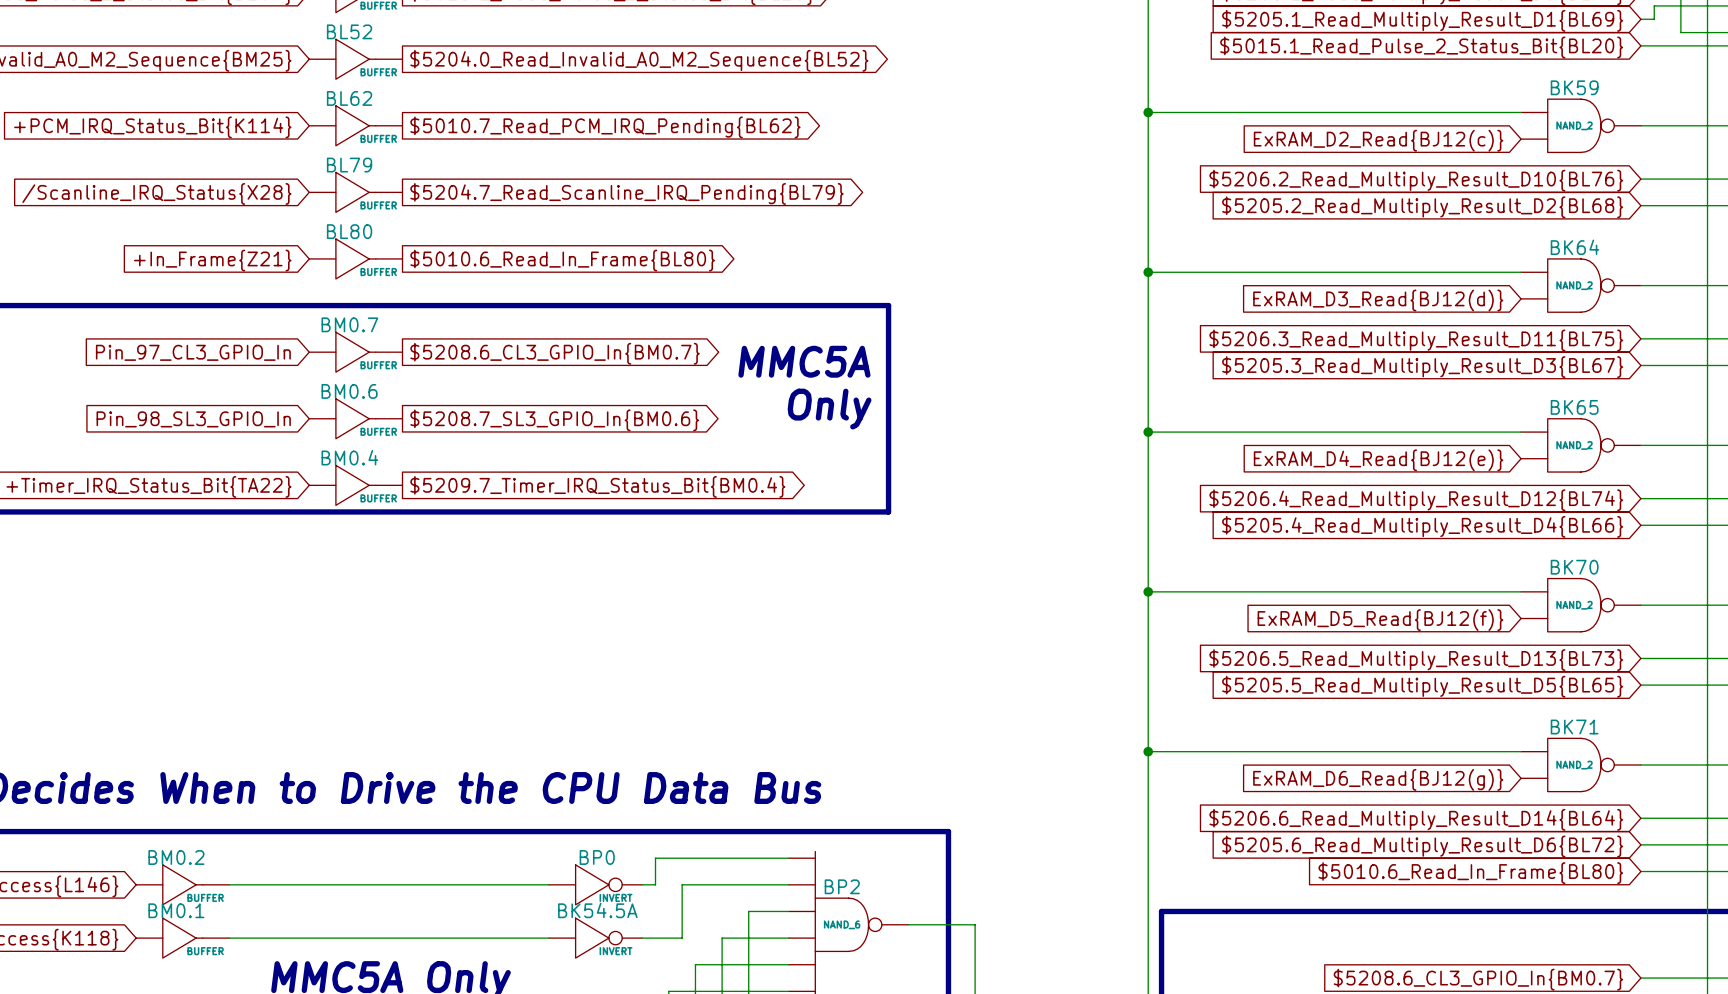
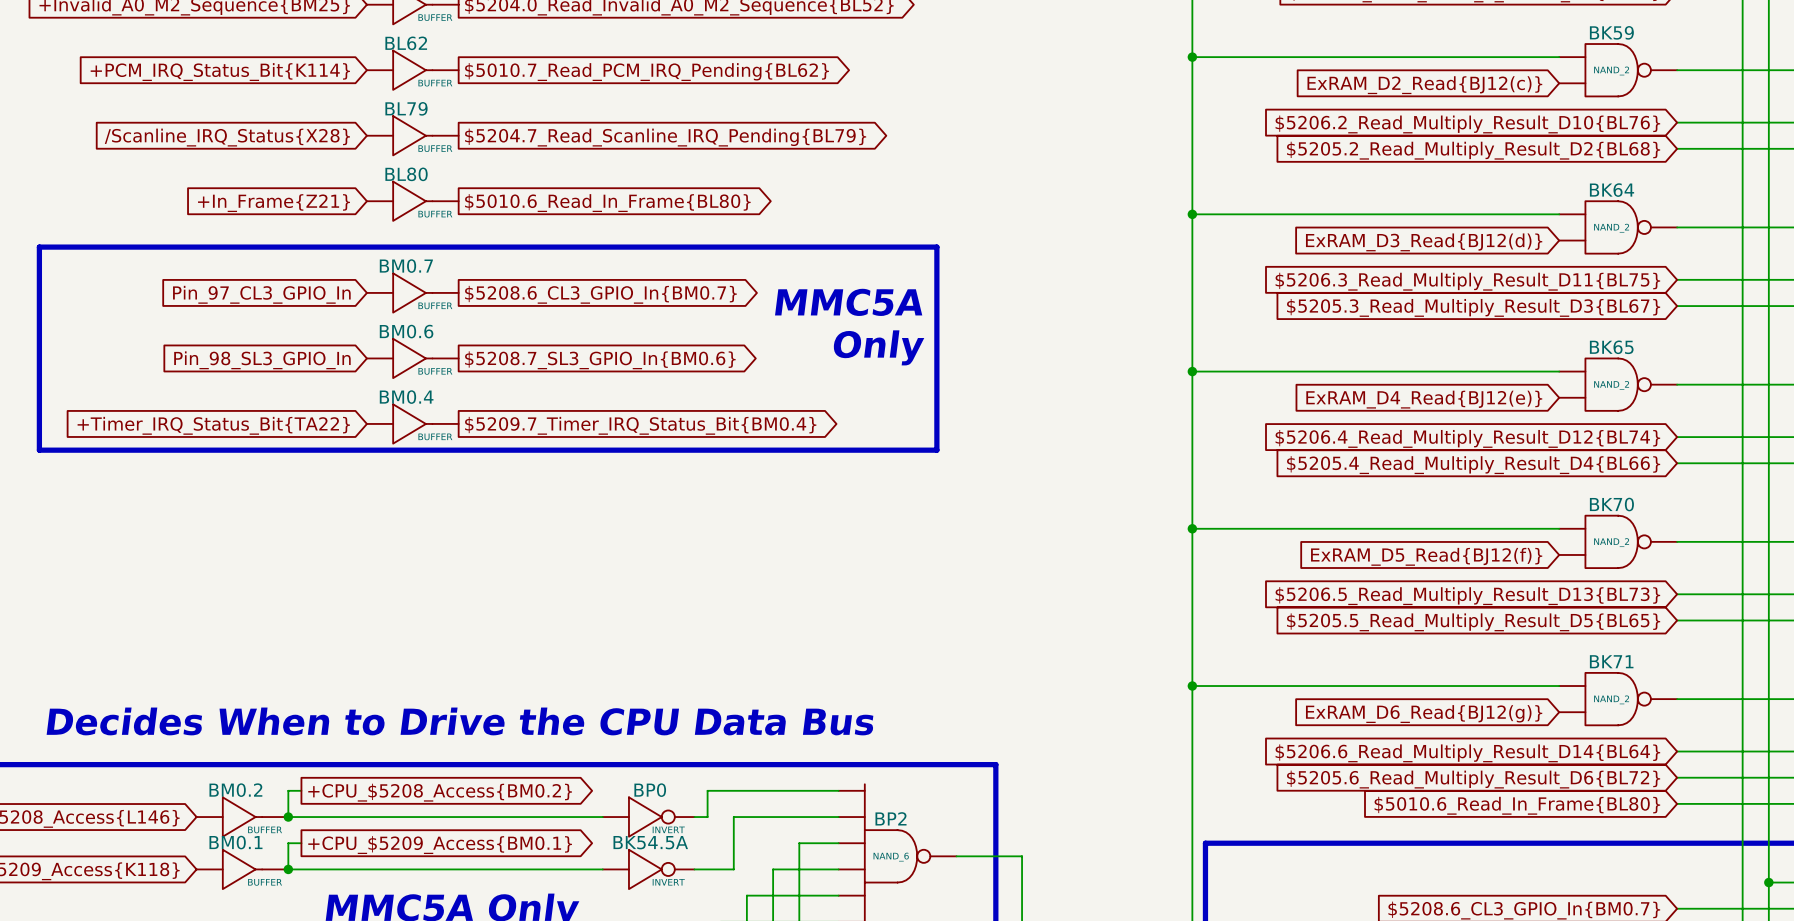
wire: none -> (301, 790) (288, 790) (288, 817)
global label: none -> +CPU_$5208_Access{BM0.2} (440, 792)
junction: none -> (288, 817)
wire: none -> (301, 843) (288, 843) (288, 869)
global label: none -> +CPU_$5209_Access{BM0.1} (440, 845)
junction: none -> (288, 869)

